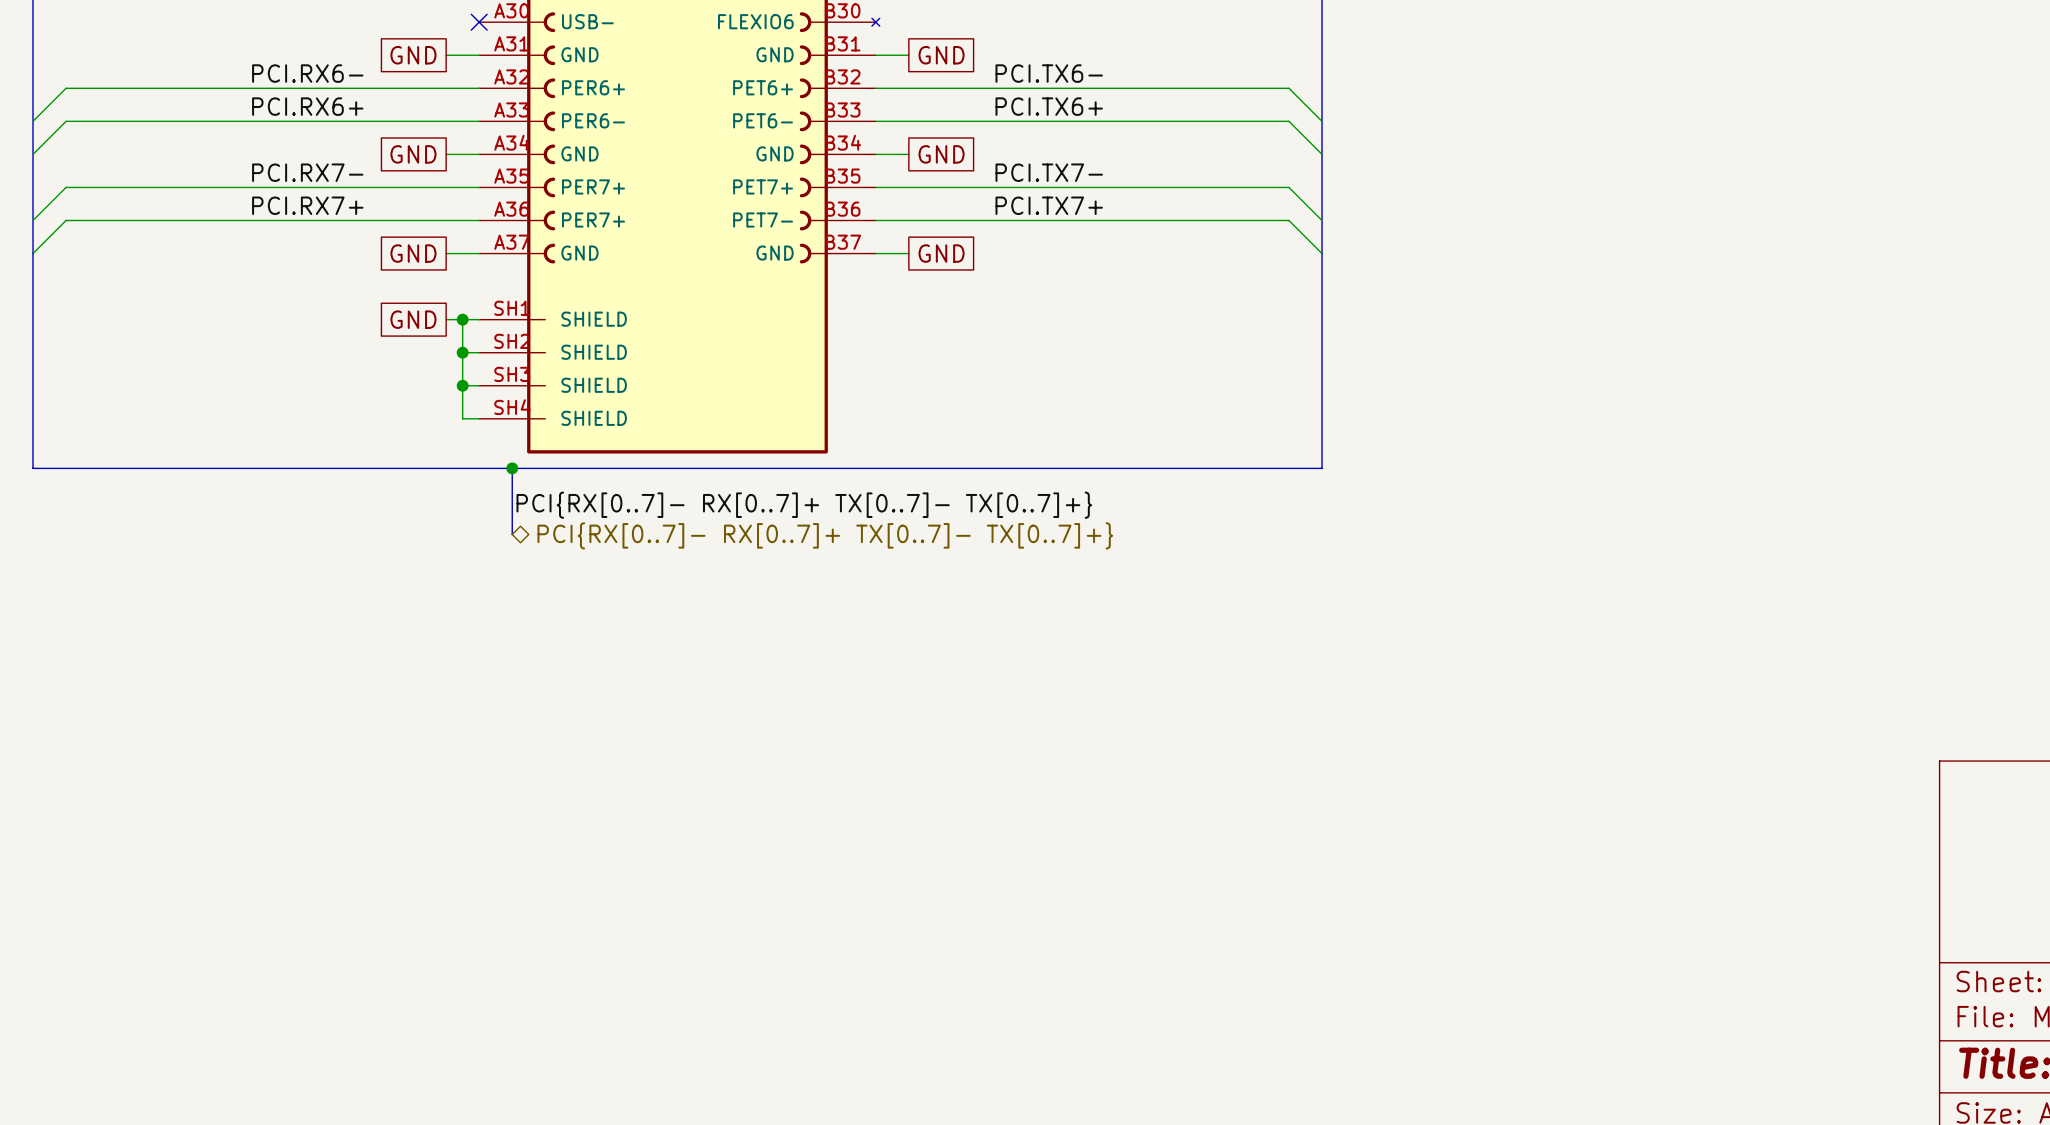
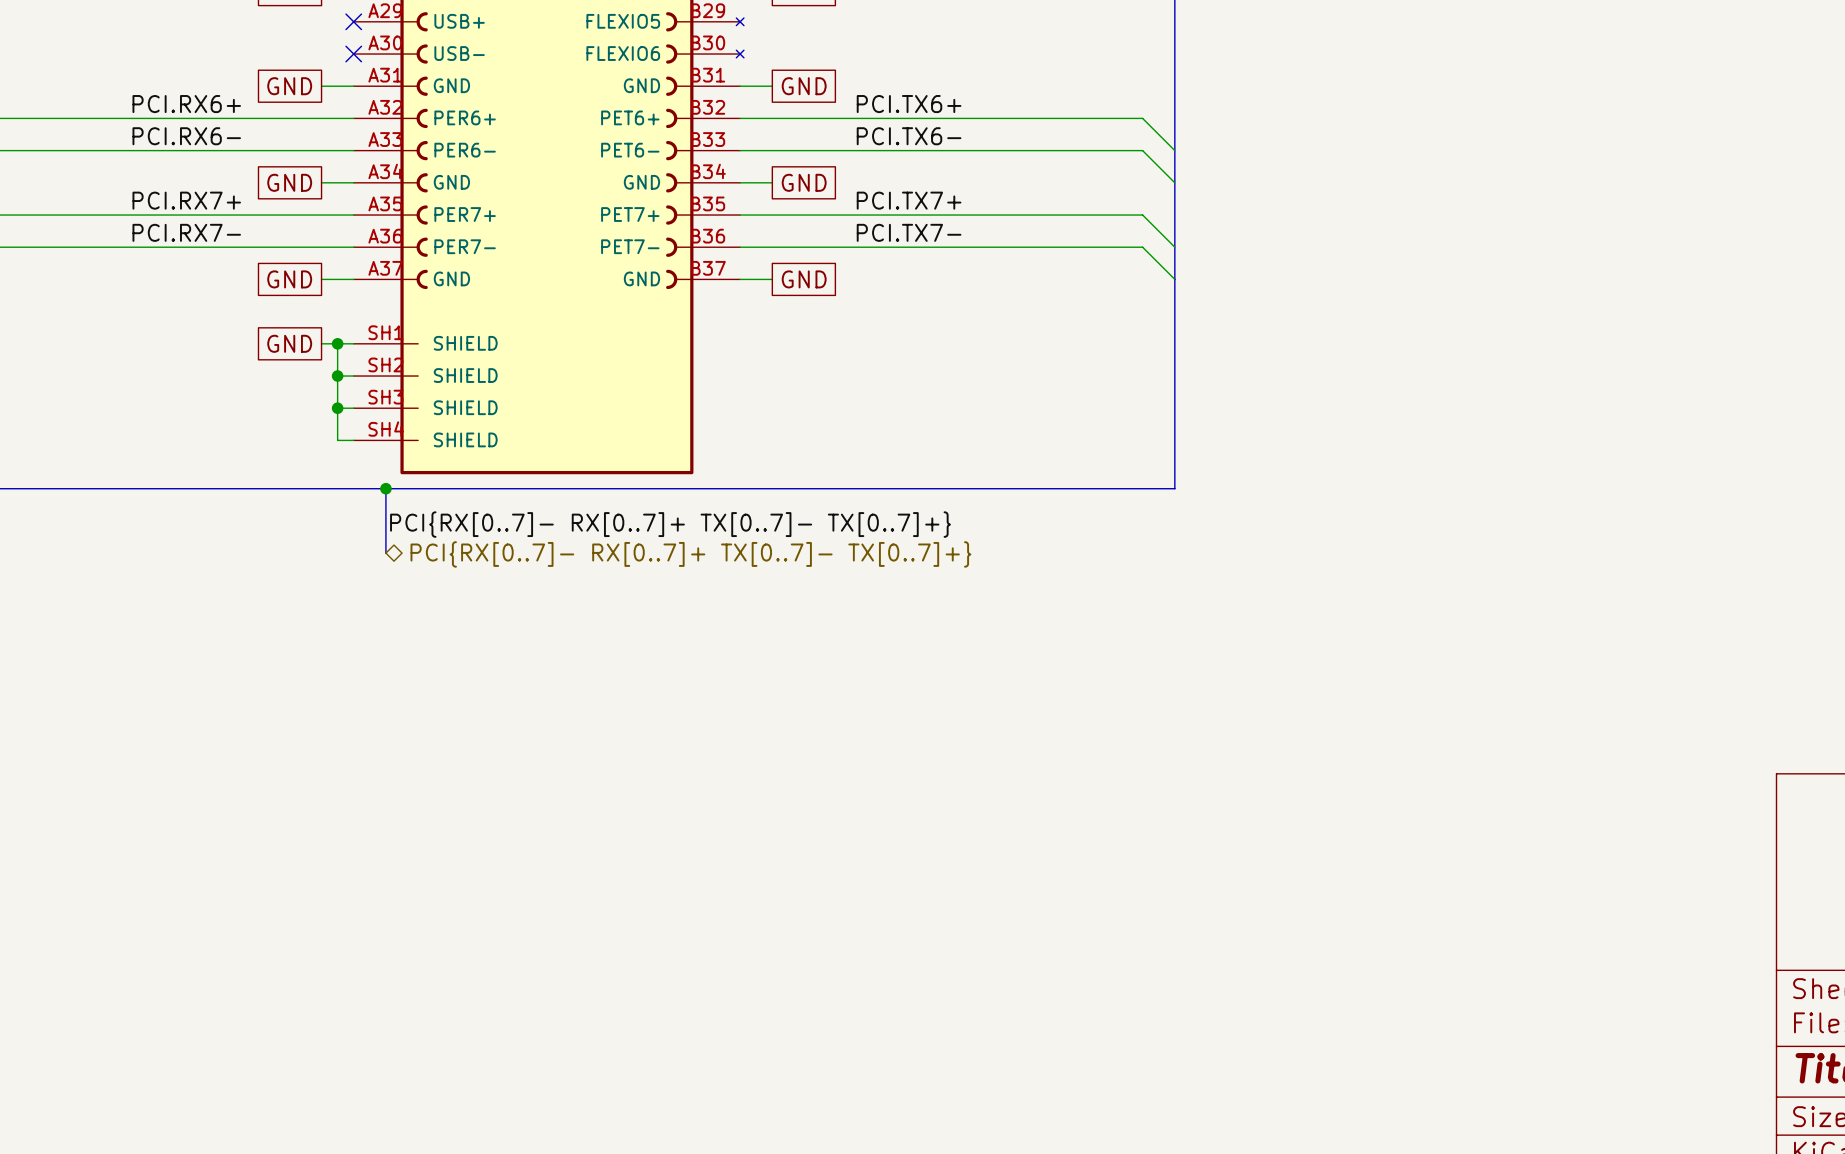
label: PCI.RX6- (307, 73) -> PCI.RX6+ (186, 104)
label: PCI.TX6- (1049, 73) -> PCI.TX6+ (909, 104)
label: PCI.RX6+ (307, 106) -> PCI.RX6- (186, 136)
label: PCI.TX6+ (1049, 106) -> PCI.TX6- (909, 136)
label: PCI.RX7- (307, 172) -> PCI.RX7+ (186, 200)
label: PCI.TX7- (1049, 172) -> PCI.TX7+ (909, 200)
label: PCI.RX7+ (307, 205) -> PCI.RX7- (186, 232)
label: PCI.TX7+ (1049, 205) -> PCI.TX7- (909, 232)
part pin name: PER7+ (593, 220) -> PER7- (465, 246)

